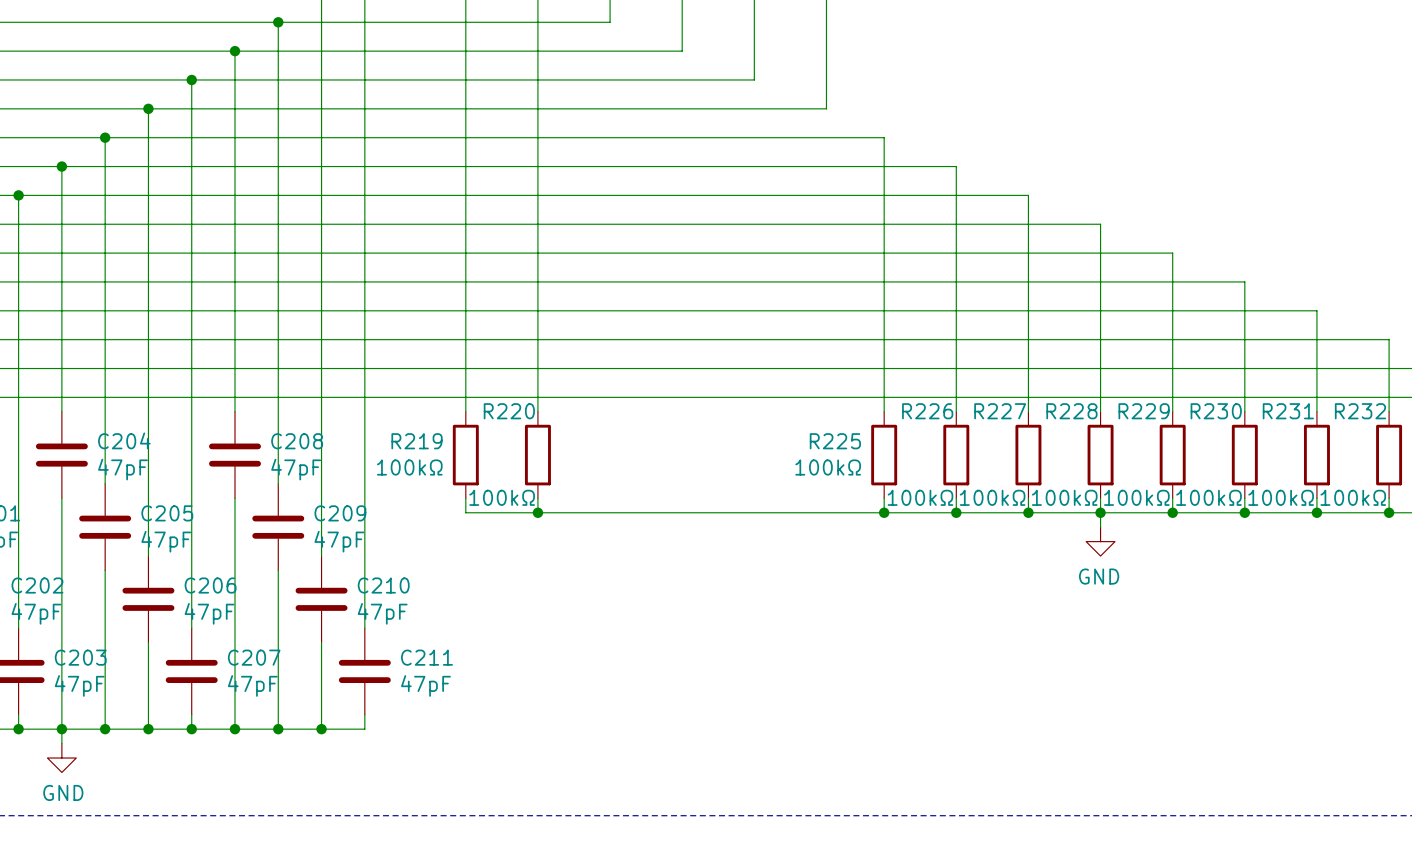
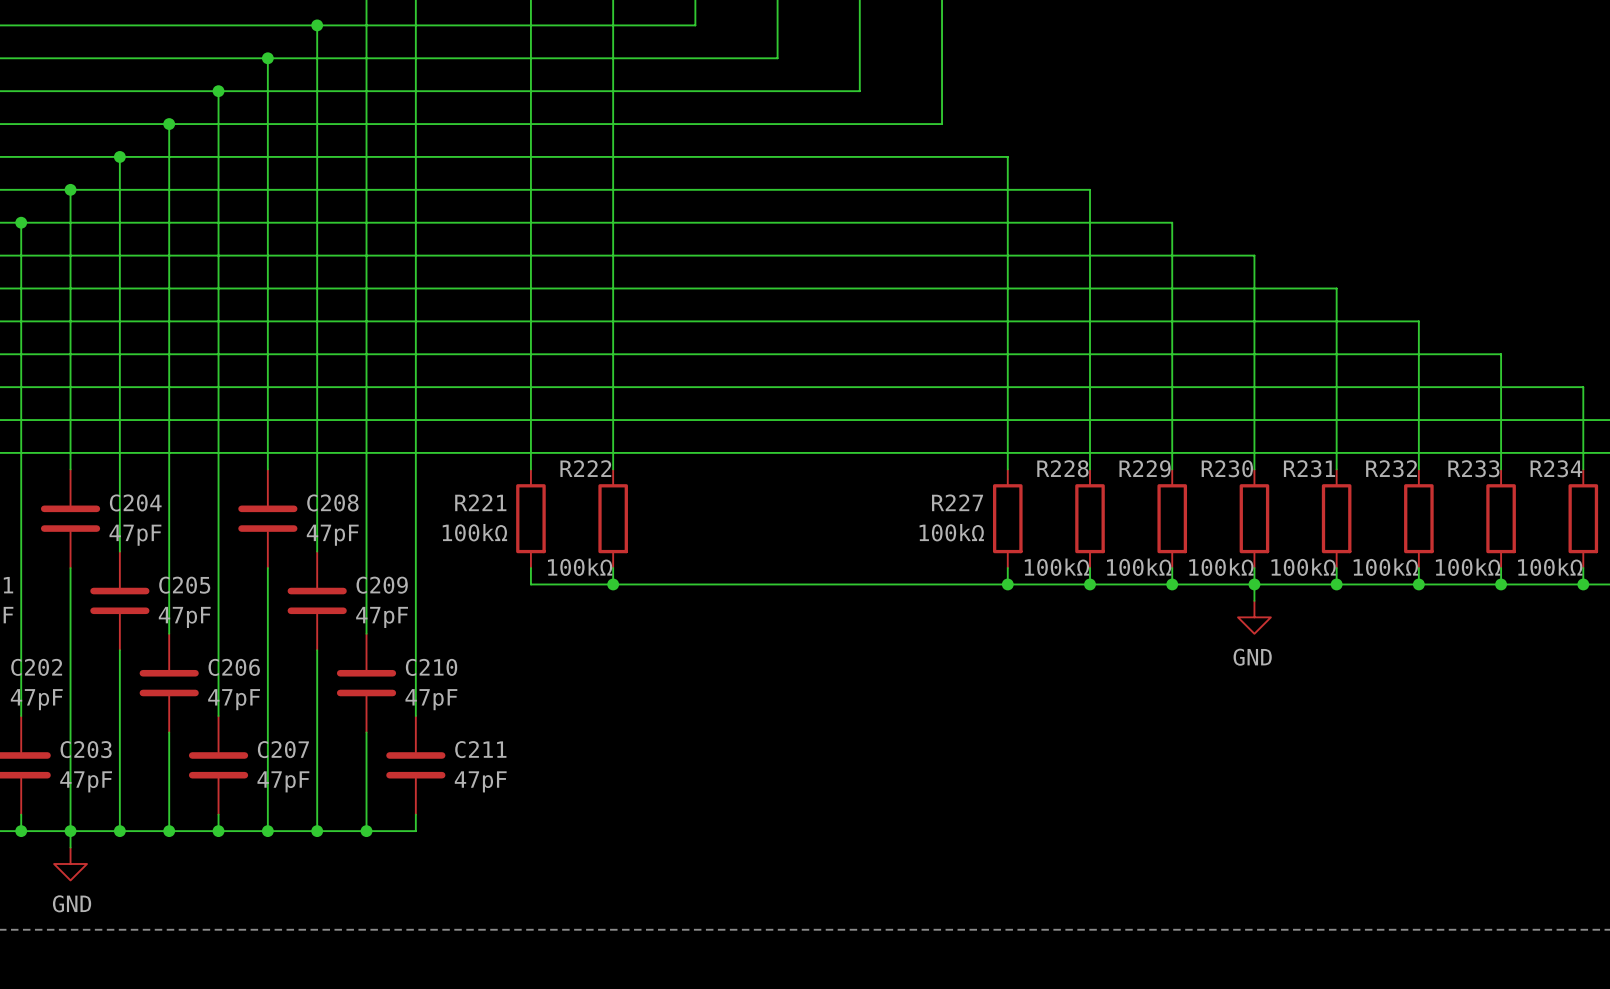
R220 name: R220 (509, 411) -> R222 (585, 468)
R226 name: R226 (927, 411) -> R228 (1062, 468)
R227 name: R227 (1000, 411) -> R229 (1145, 468)
R228 name: R228 (1071, 411) -> R230 (1227, 468)
R229 name: R229 (1144, 411) -> R231 (1309, 468)
R230 name: R230 (1216, 411) -> R232 (1391, 468)
R231 name: R231 (1288, 411) -> R233 (1473, 468)
R232 name: R232 (1360, 411) -> R234 (1556, 468)
R219 name: R219 (417, 441) -> R221 (480, 502)
R225 name: R225 (835, 441) -> R227 (957, 502)

